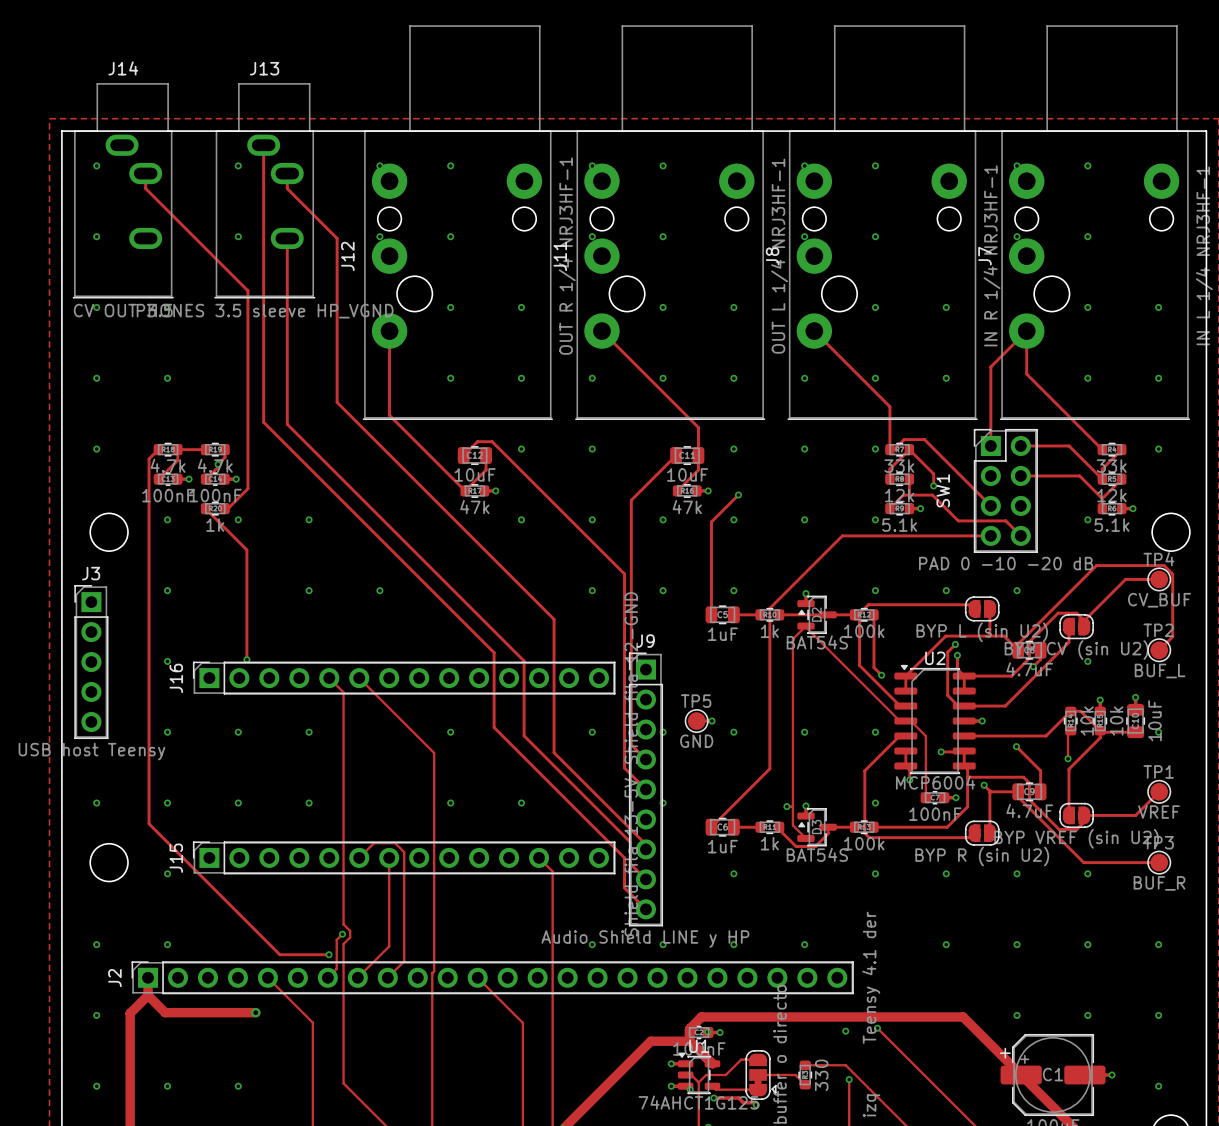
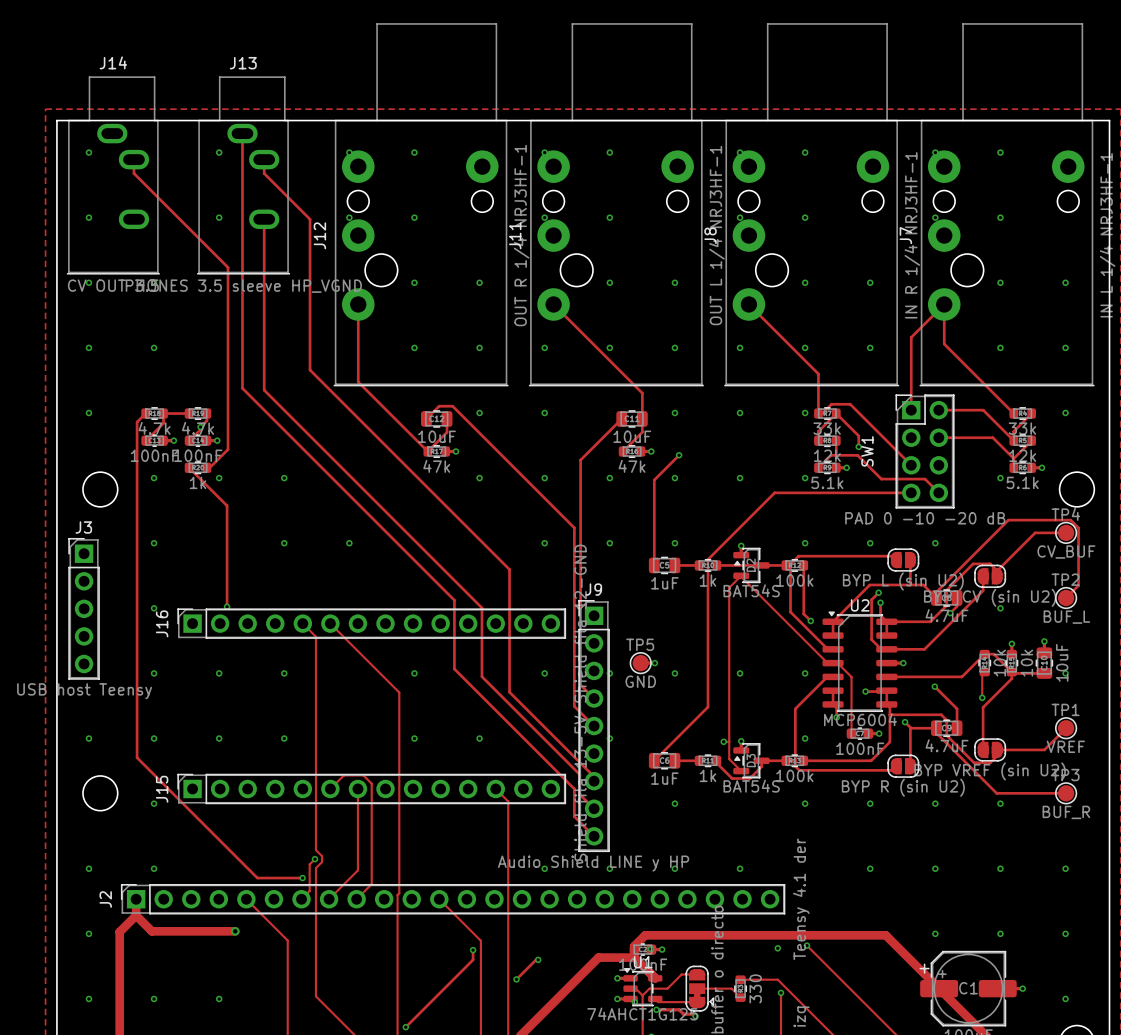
track: none -> (473, 950) (473, 959) (405, 1027)
via: none -> (473, 950)
track: none -> (538, 959) (516, 979)
via: none -> (538, 959)
via: none -> (516, 979)
via: none -> (405, 1027)

